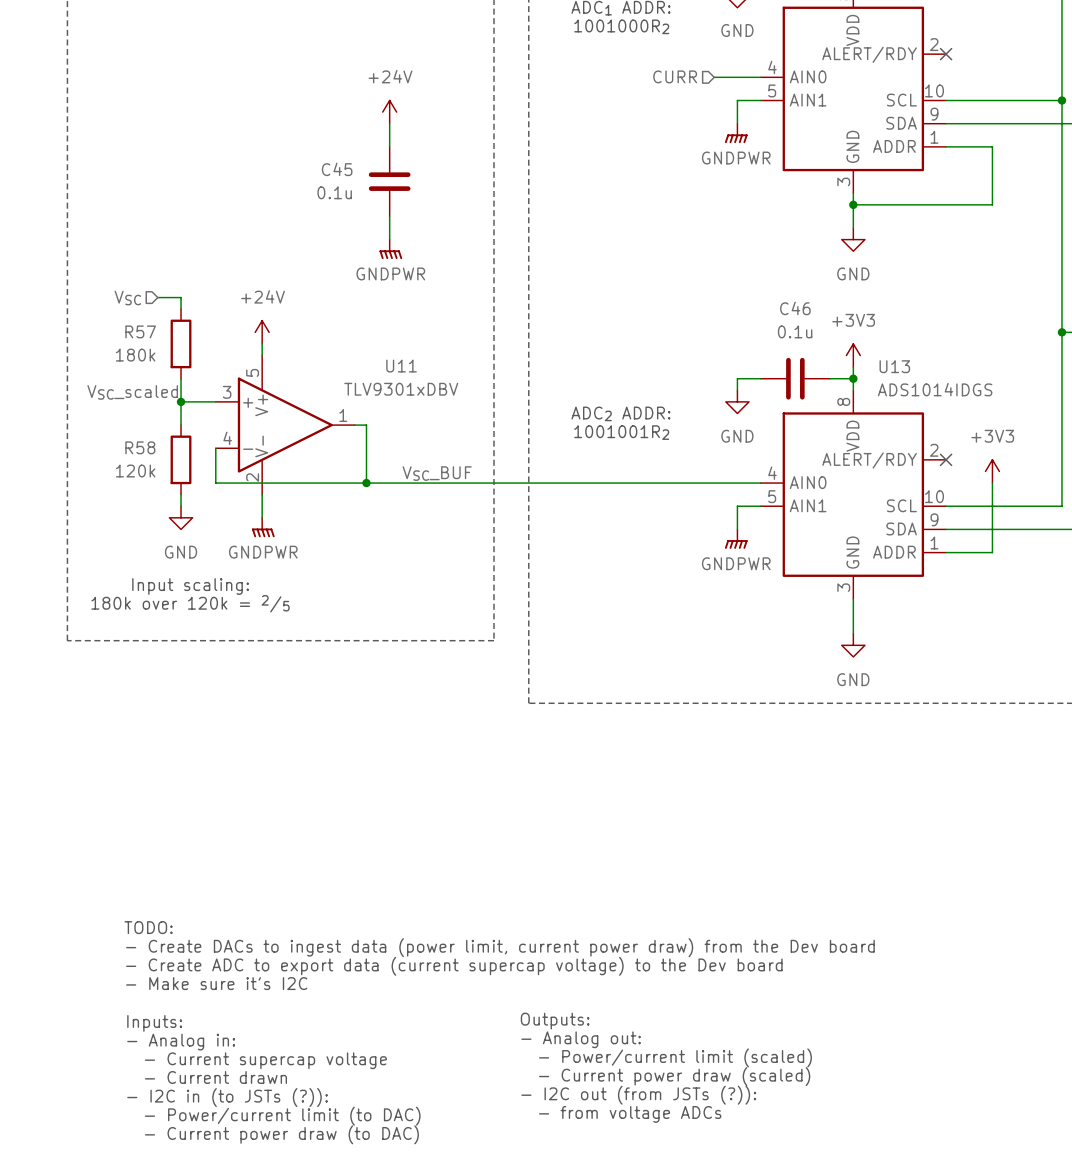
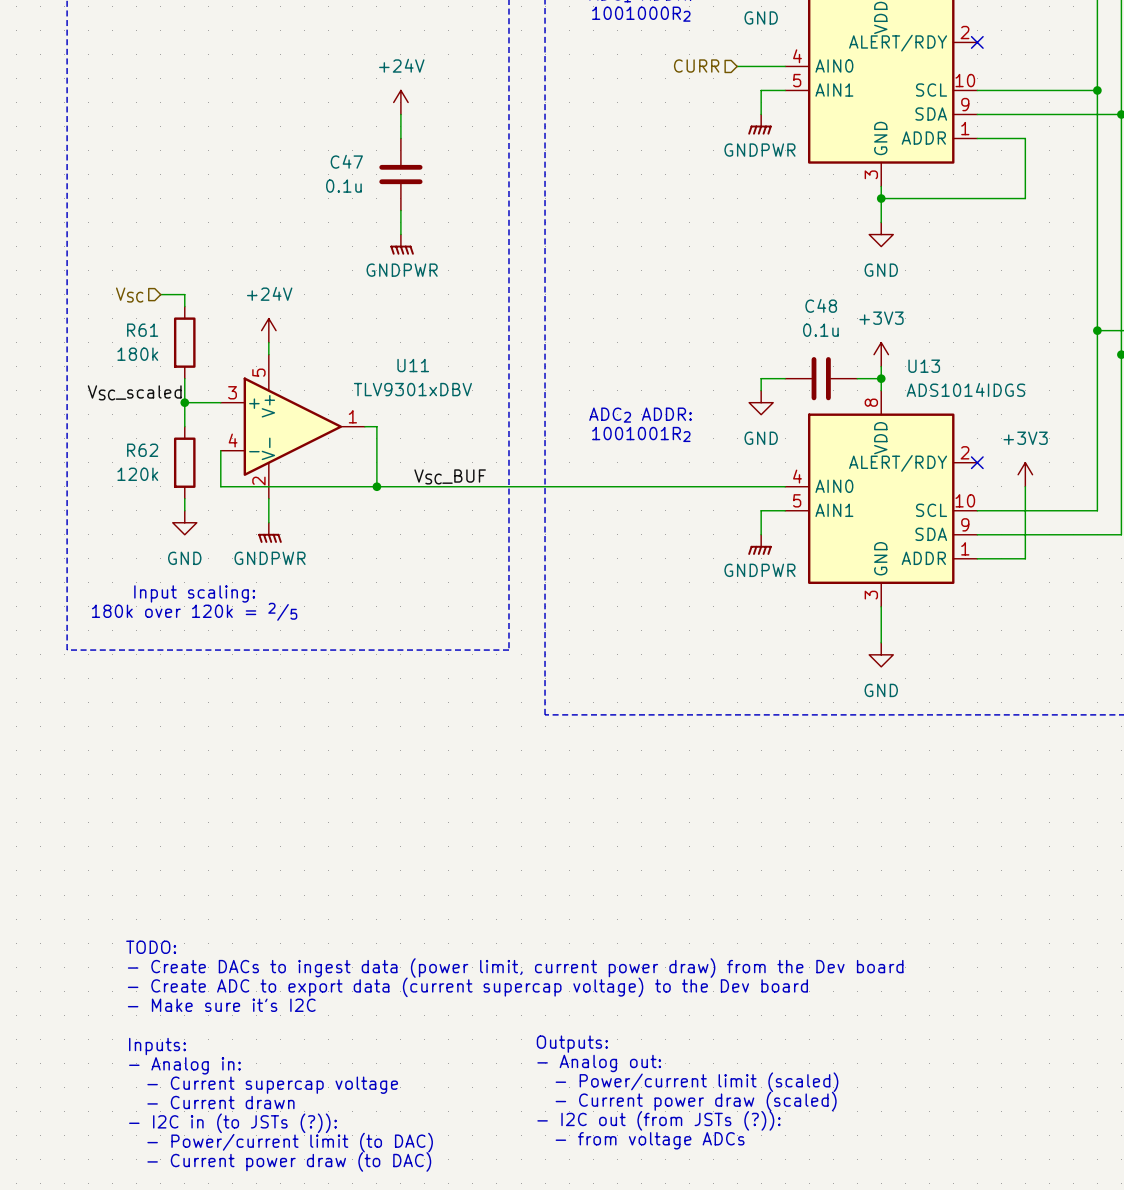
C45 name: C45 (337, 169) -> C47 (346, 161)
C46 name: C46 (795, 308) -> C48 (821, 305)
R57 name: R57 (140, 331) -> R61 (142, 330)
R58 name: R58 (140, 447) -> R62 (142, 450)

